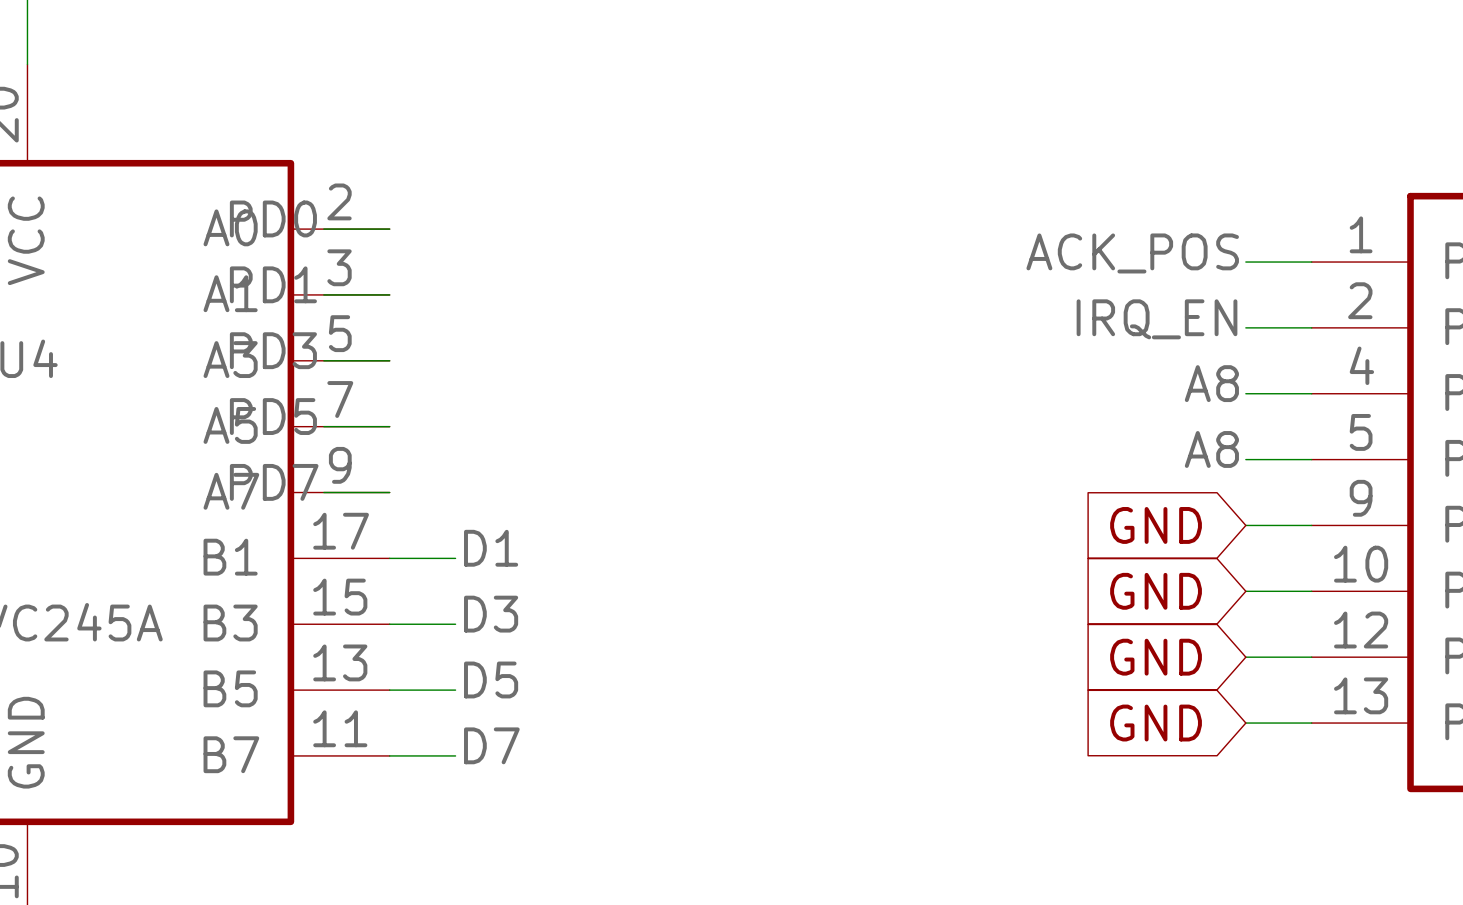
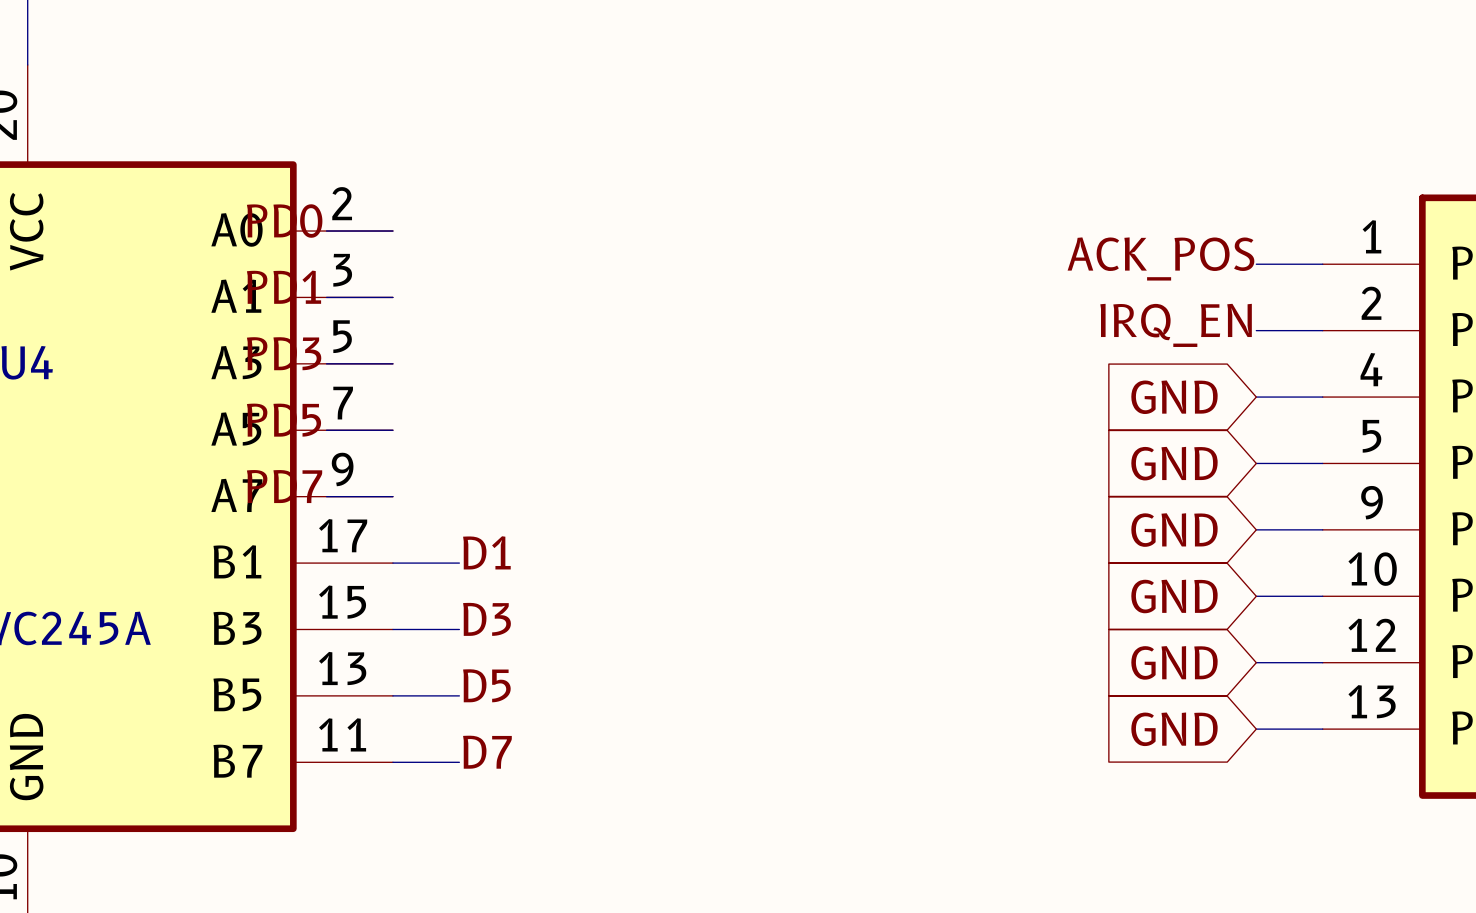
label: A8 (1211, 383) -> none
global label: none -> GND (1174, 397)
label: A8 (1211, 449) -> none
global label: none -> GND (1174, 463)

